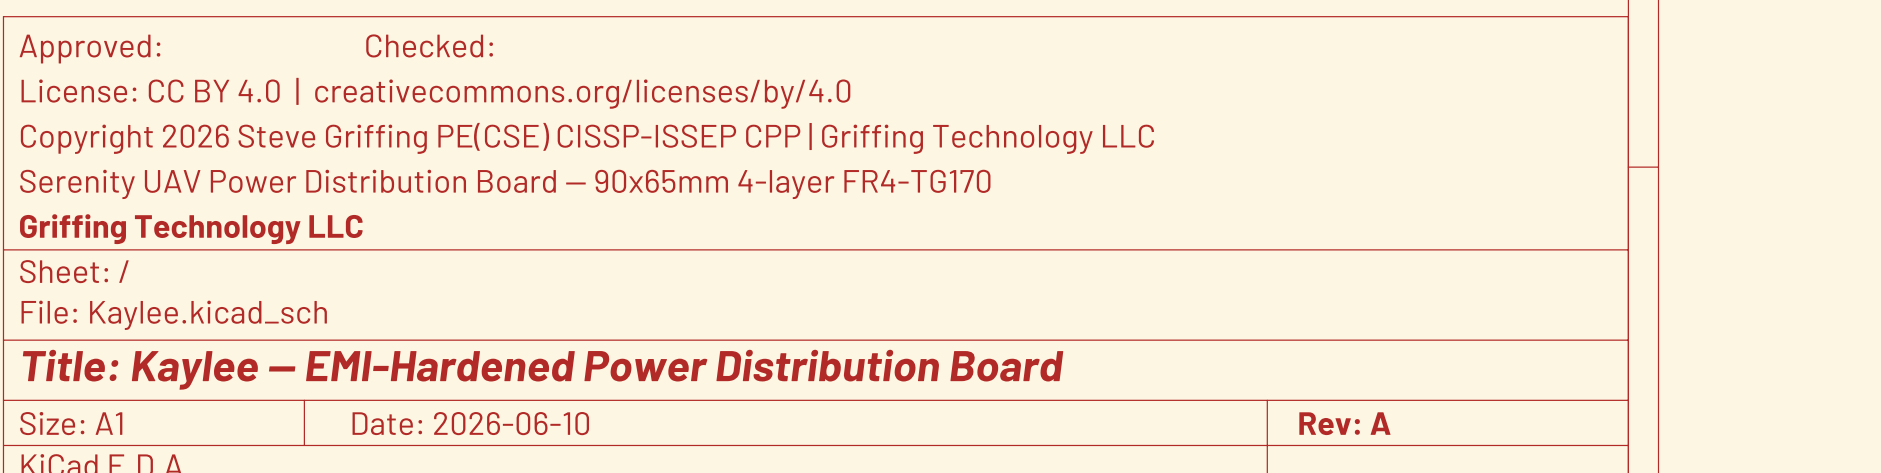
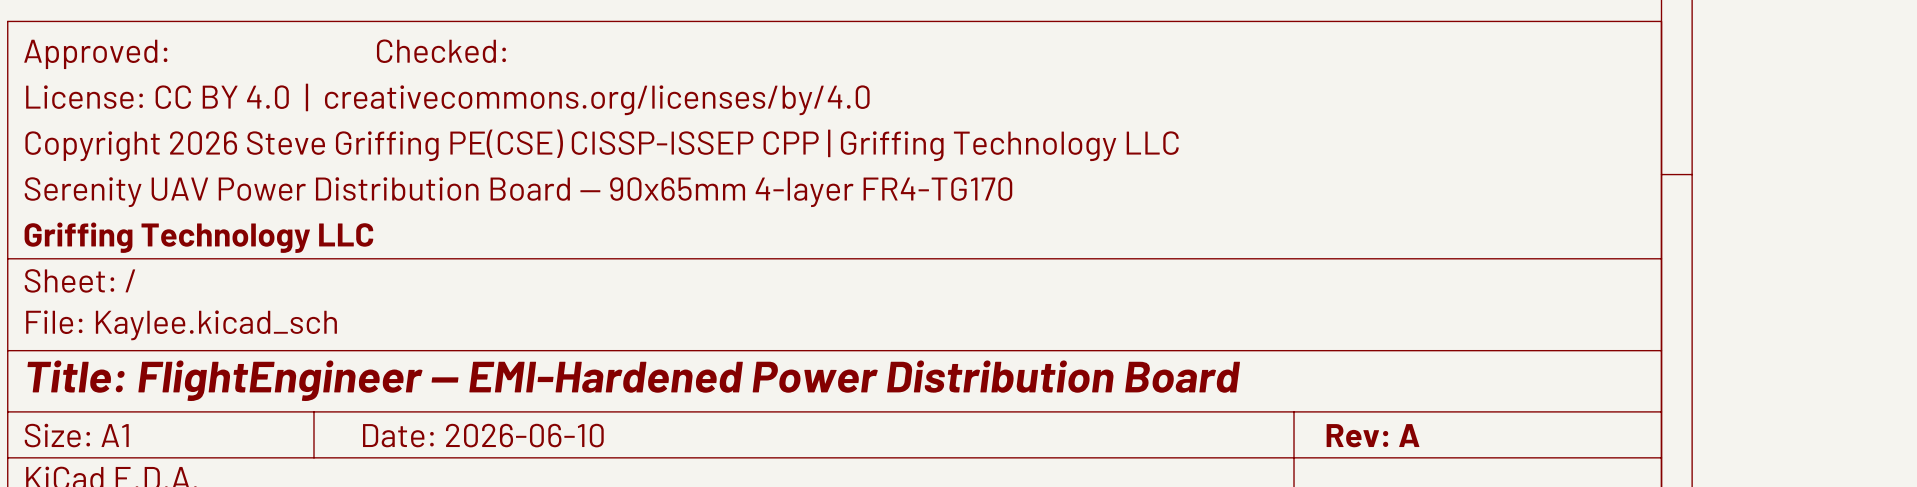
title block: Title: Kaylee — EMI-Hardened Power Distribution Board (543, 369) -> Title: FlightEngineer — EMI-Hardened Power Distribution Board (633, 380)

